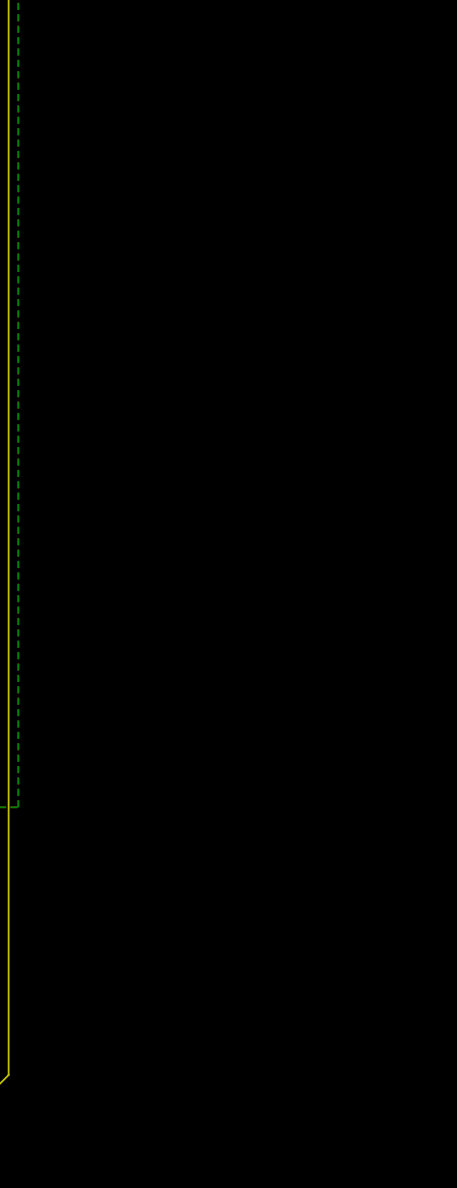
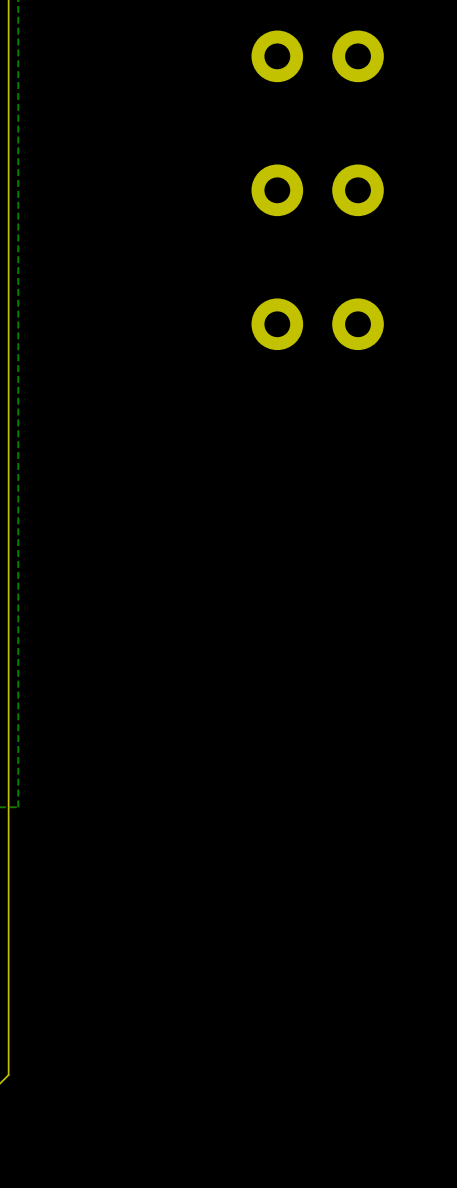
part: none -> (317, 56)
part: none -> (317, 190)
part: none -> (317, 324)

